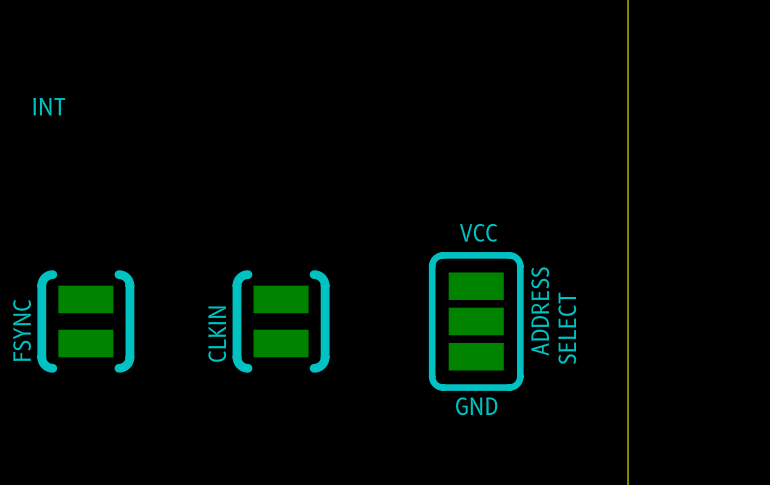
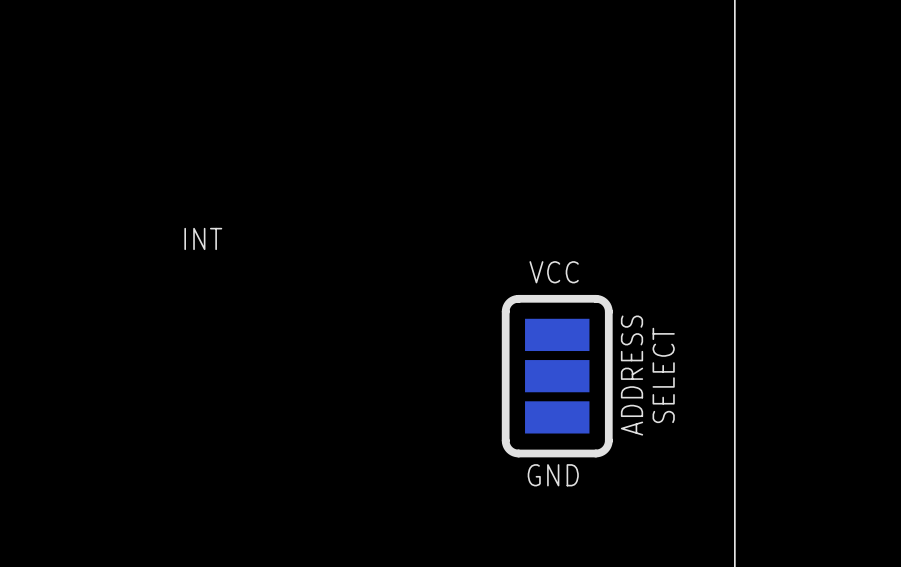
text position: INT (49, 106) -> INT (203, 238)
FSYNC: (85, 321) -> none
CLKIN: (281, 321) -> none

